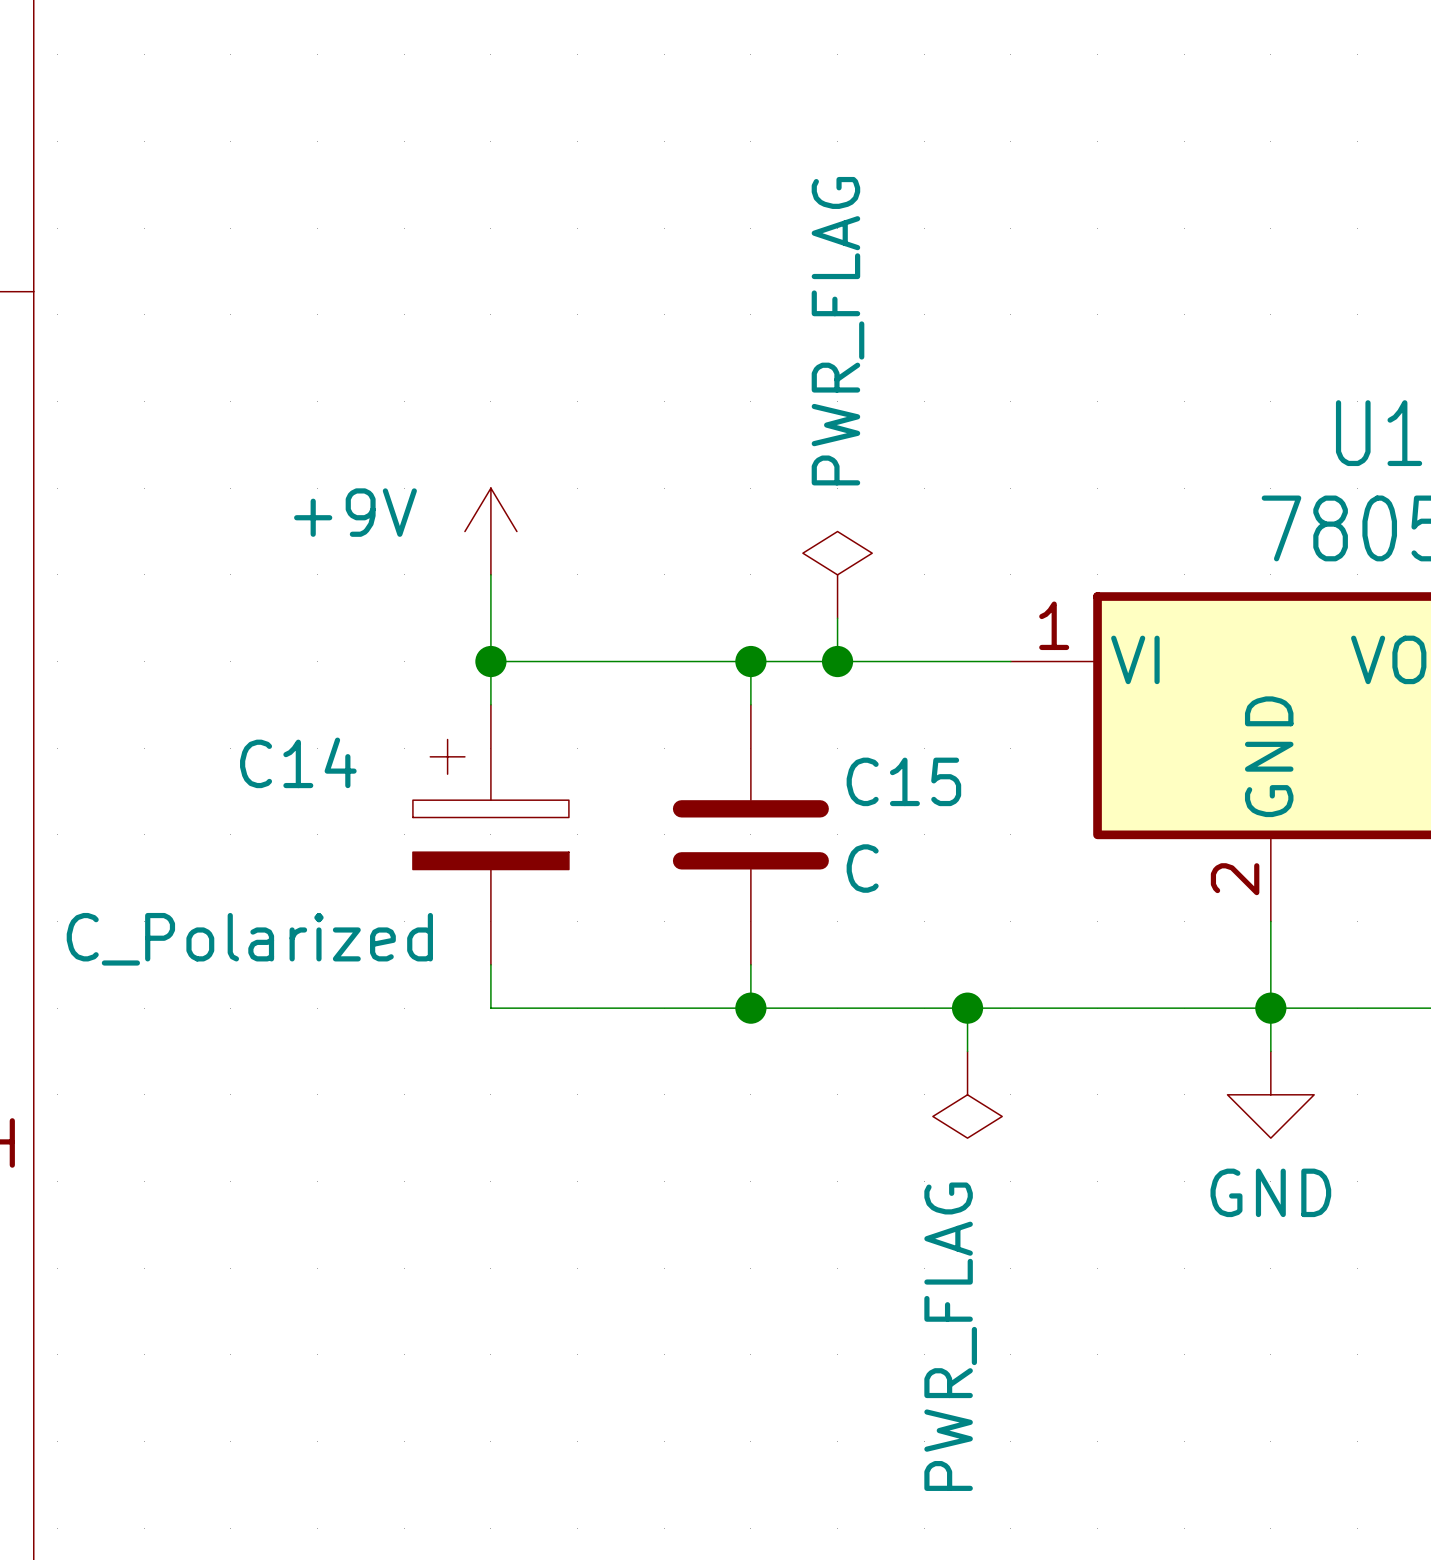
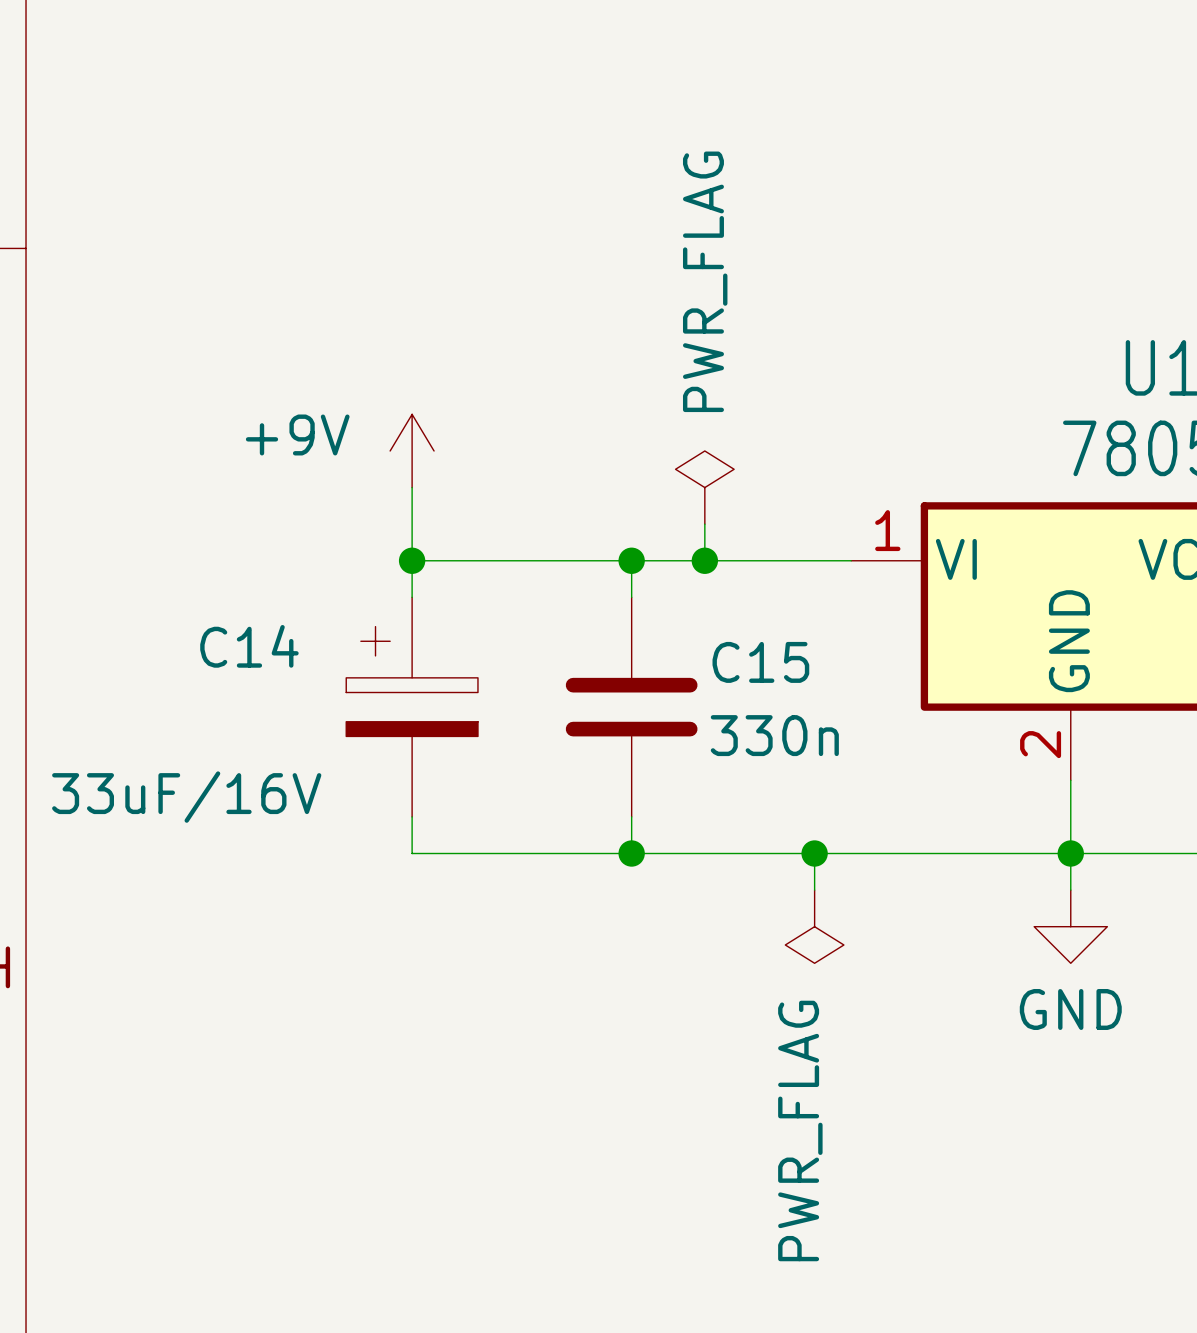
C15 value: C (862, 868) -> 330n (774, 735)
C14 value: C_Polarized (249, 939) -> 33uF/16V (186, 797)

